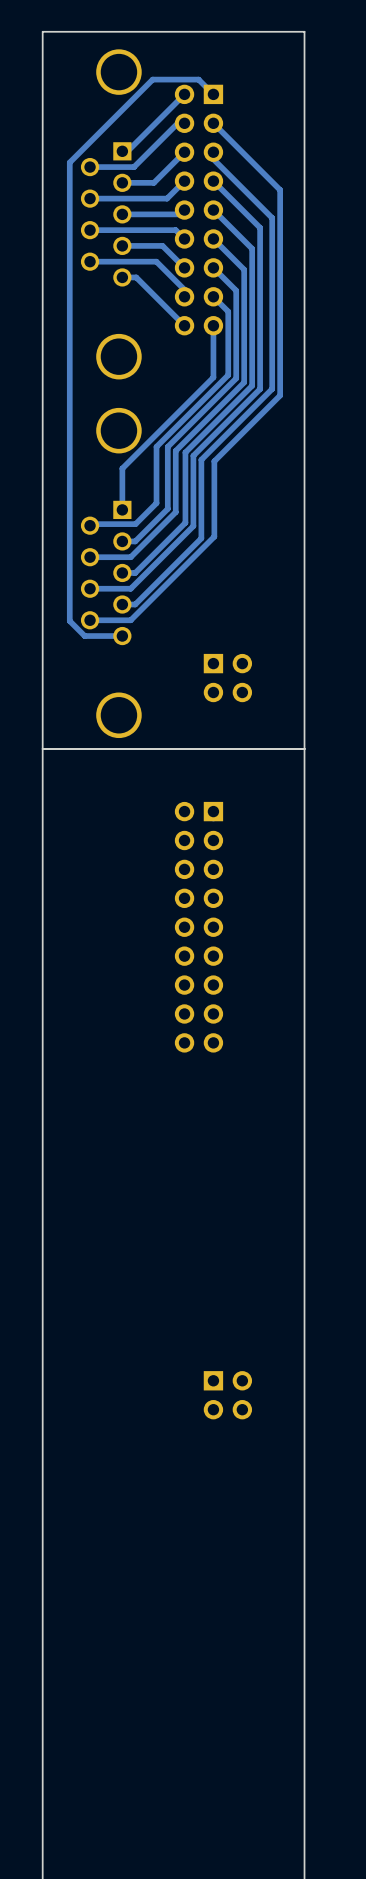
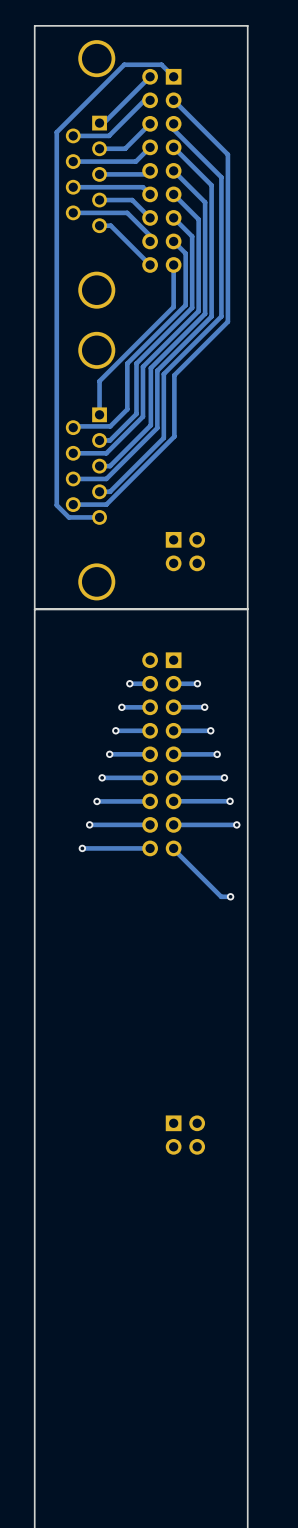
via: none -> (129, 683)
track: none -> (150, 683) (129, 683)
track: none -> (197, 683) (173, 683)
via: none -> (197, 683)
via: none -> (121, 707)
track: none -> (150, 707) (121, 707)
track: none -> (204, 707) (172, 707)
via: none -> (204, 707)
via: none -> (115, 730)
track: none -> (149, 730) (115, 730)
track: none -> (210, 730) (174, 730)
via: none -> (210, 730)
via: none -> (109, 754)
track: none -> (149, 754) (109, 754)
track: none -> (217, 754) (173, 754)
via: none -> (217, 754)
via: none -> (102, 777)
track: none -> (150, 777) (102, 777)
track: none -> (224, 777) (174, 777)
via: none -> (224, 777)
track: none -> (230, 801) (172, 801)
via: none -> (230, 801)
via: none -> (97, 801)
track: none -> (149, 801) (97, 801)
via: none -> (89, 824)
track: none -> (149, 824) (89, 824)
track: none -> (236, 824) (173, 824)
via: none -> (236, 824)
via: none -> (82, 848)
track: none -> (149, 848) (82, 848)
track: none -> (174, 849) (221, 896) (230, 896)
via: none -> (230, 896)

